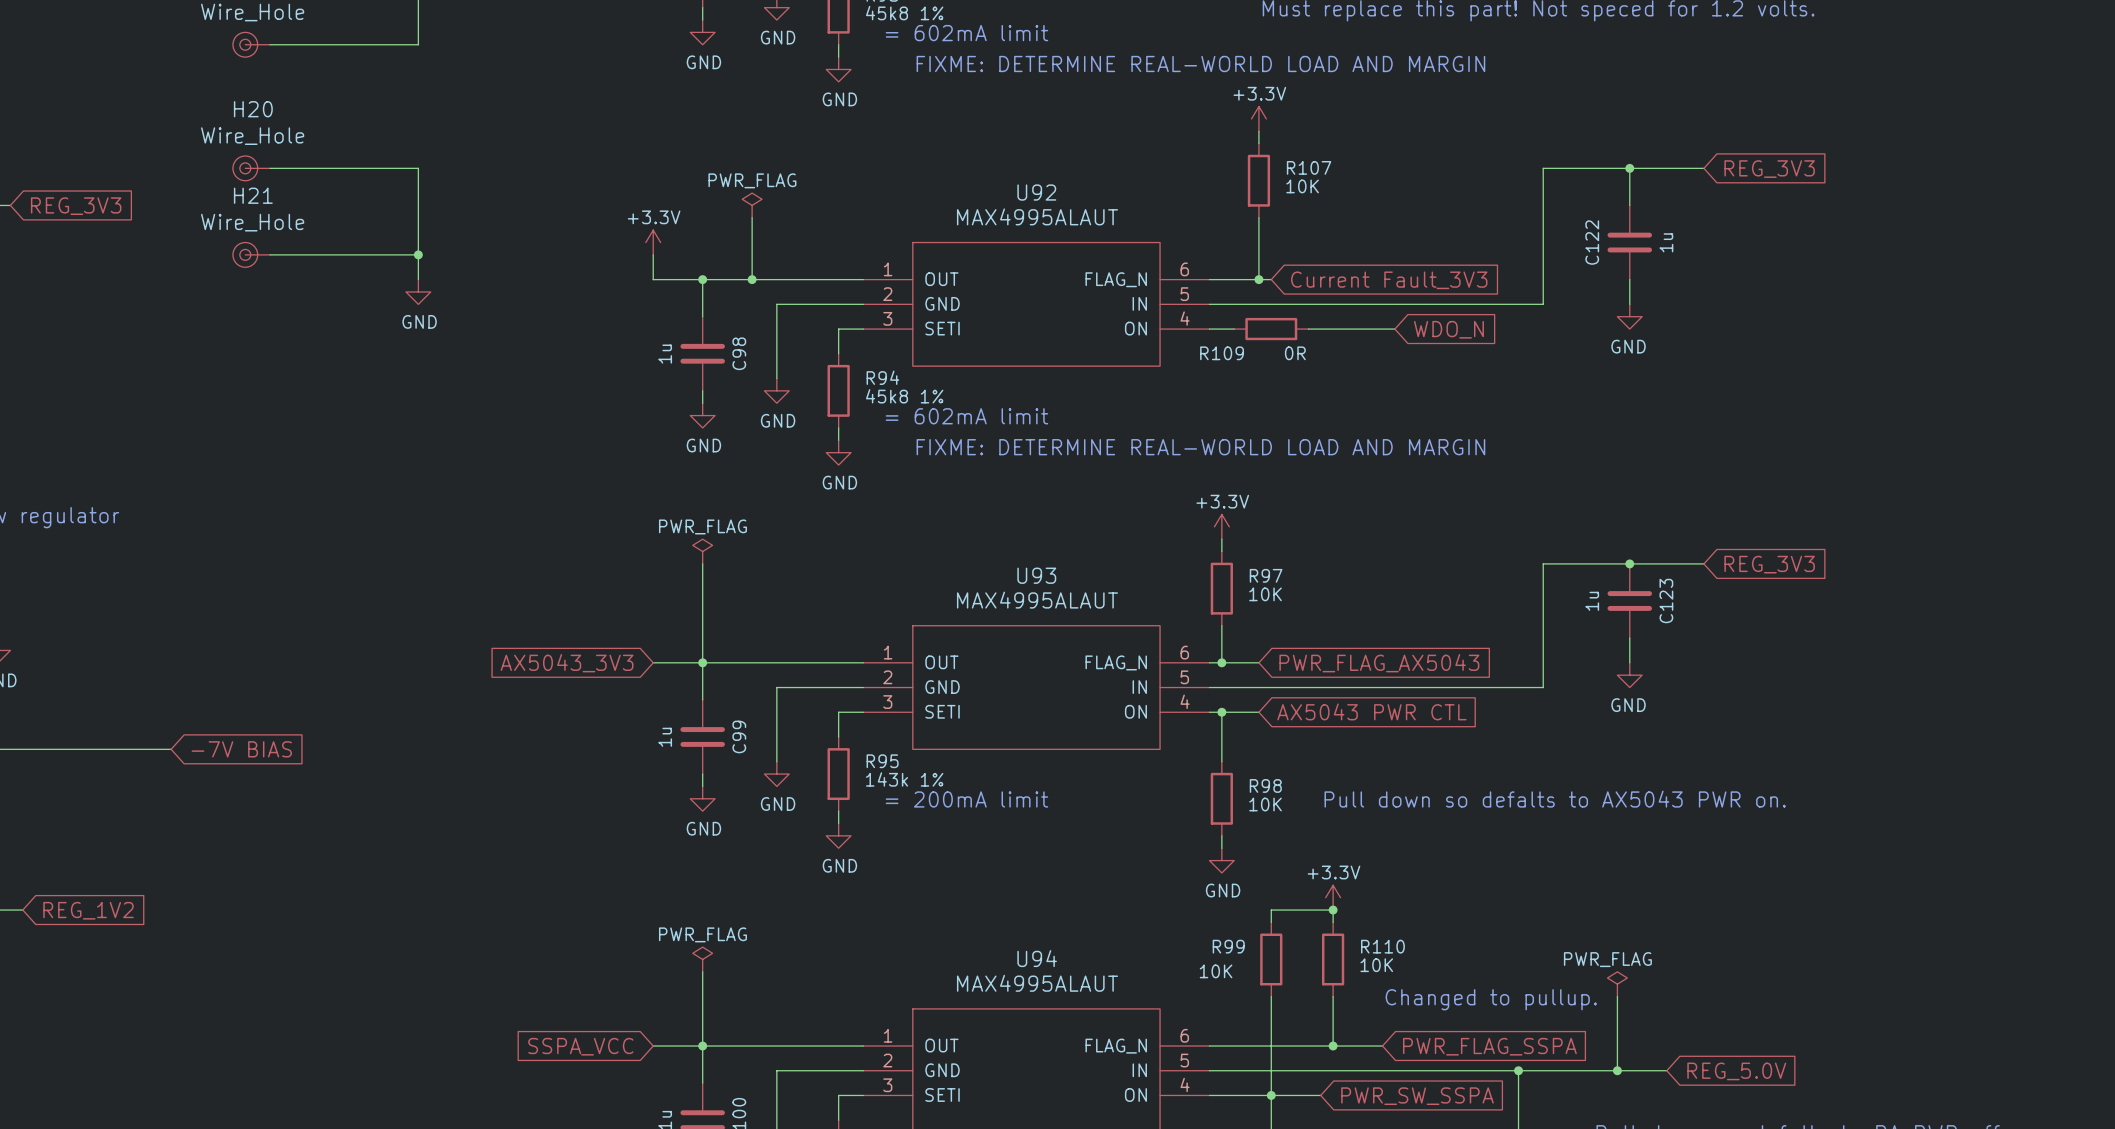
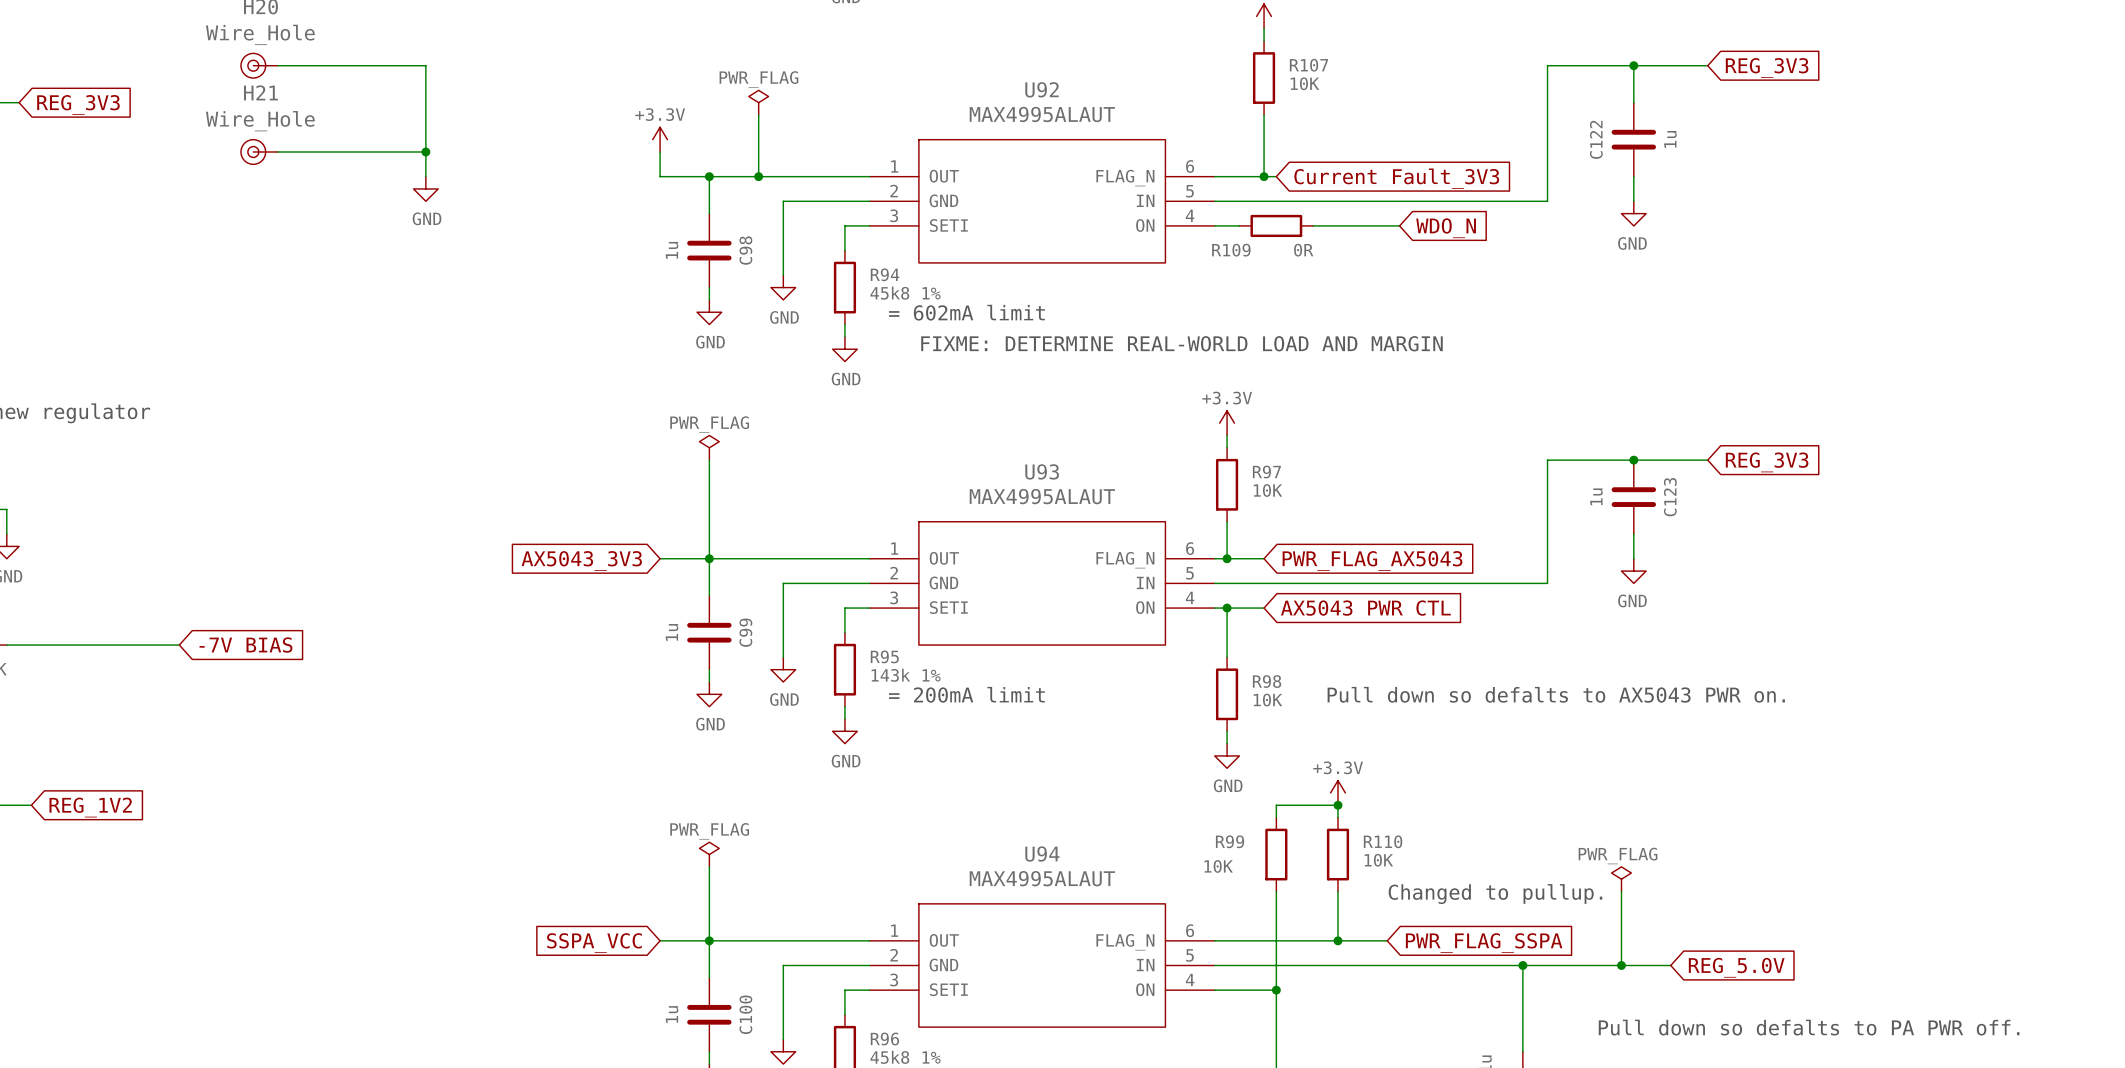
wire: (1271, 1095) (1320, 1095) -> none
global label: PWR_SW_SSPA (1417, 1096) -> none

